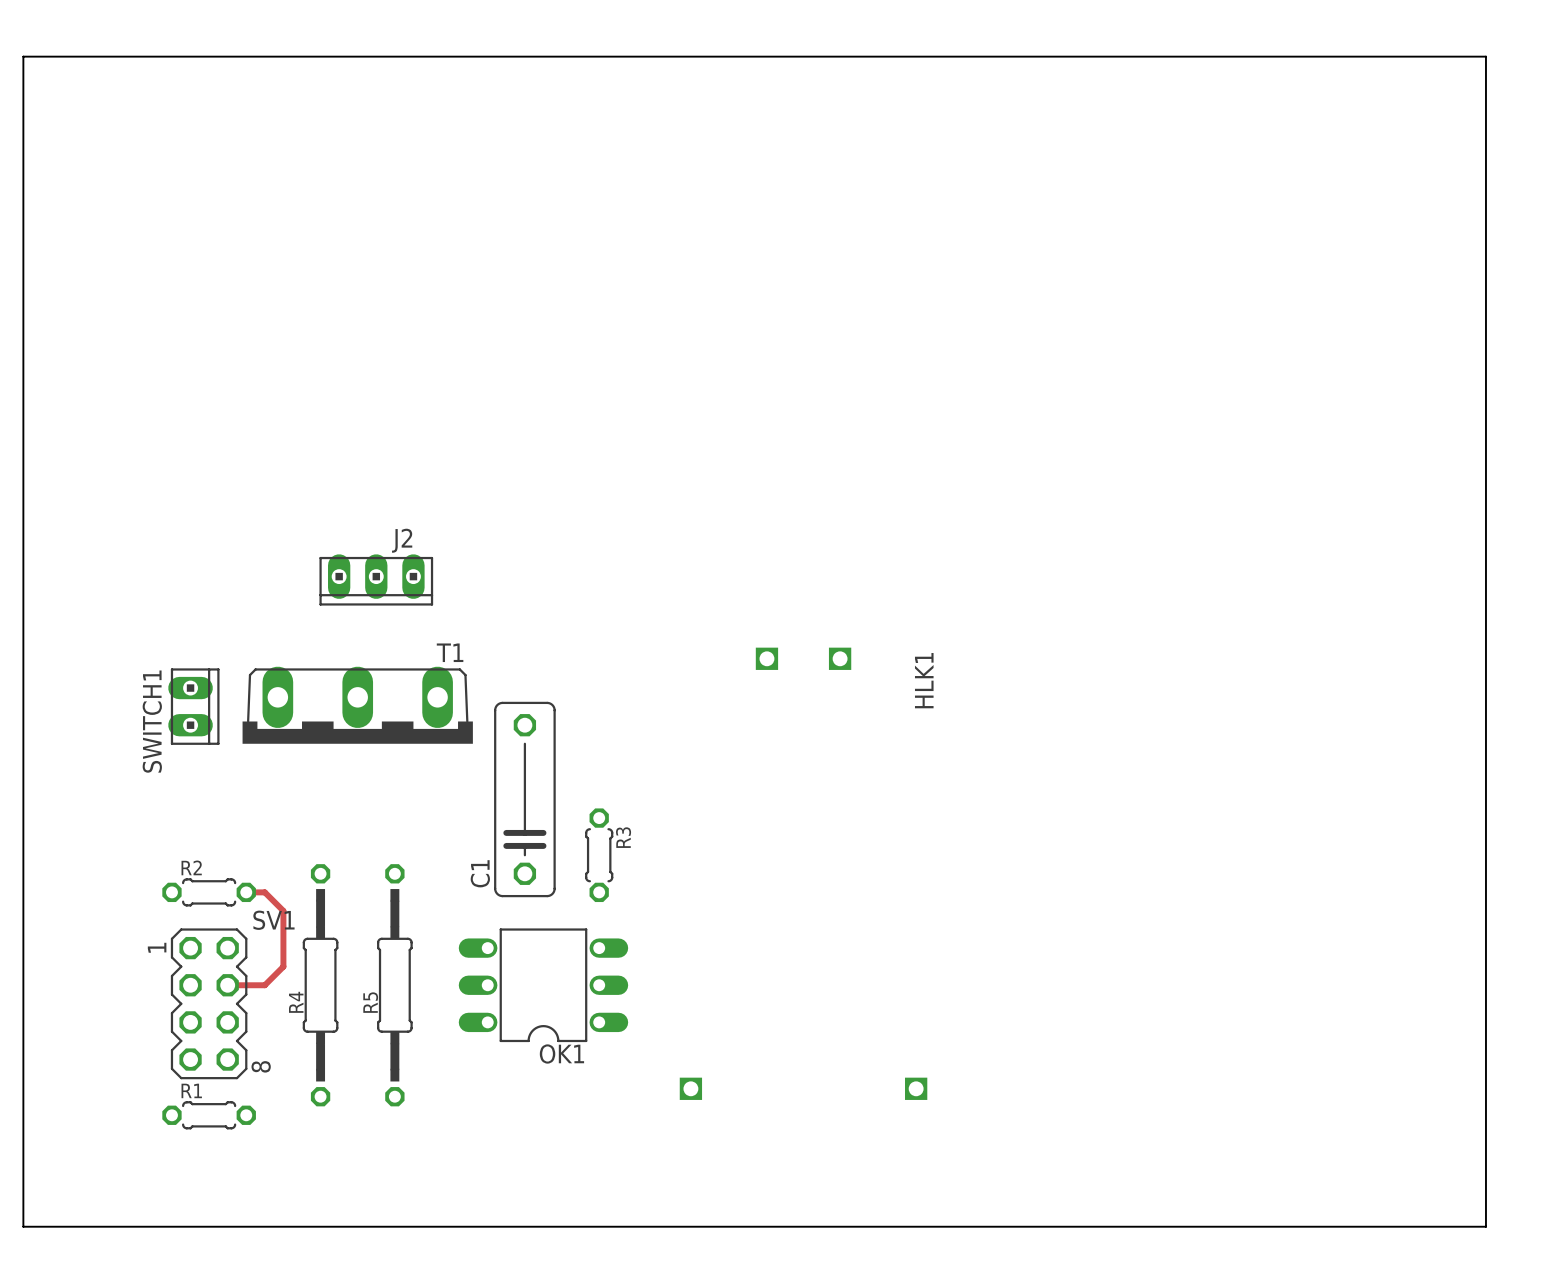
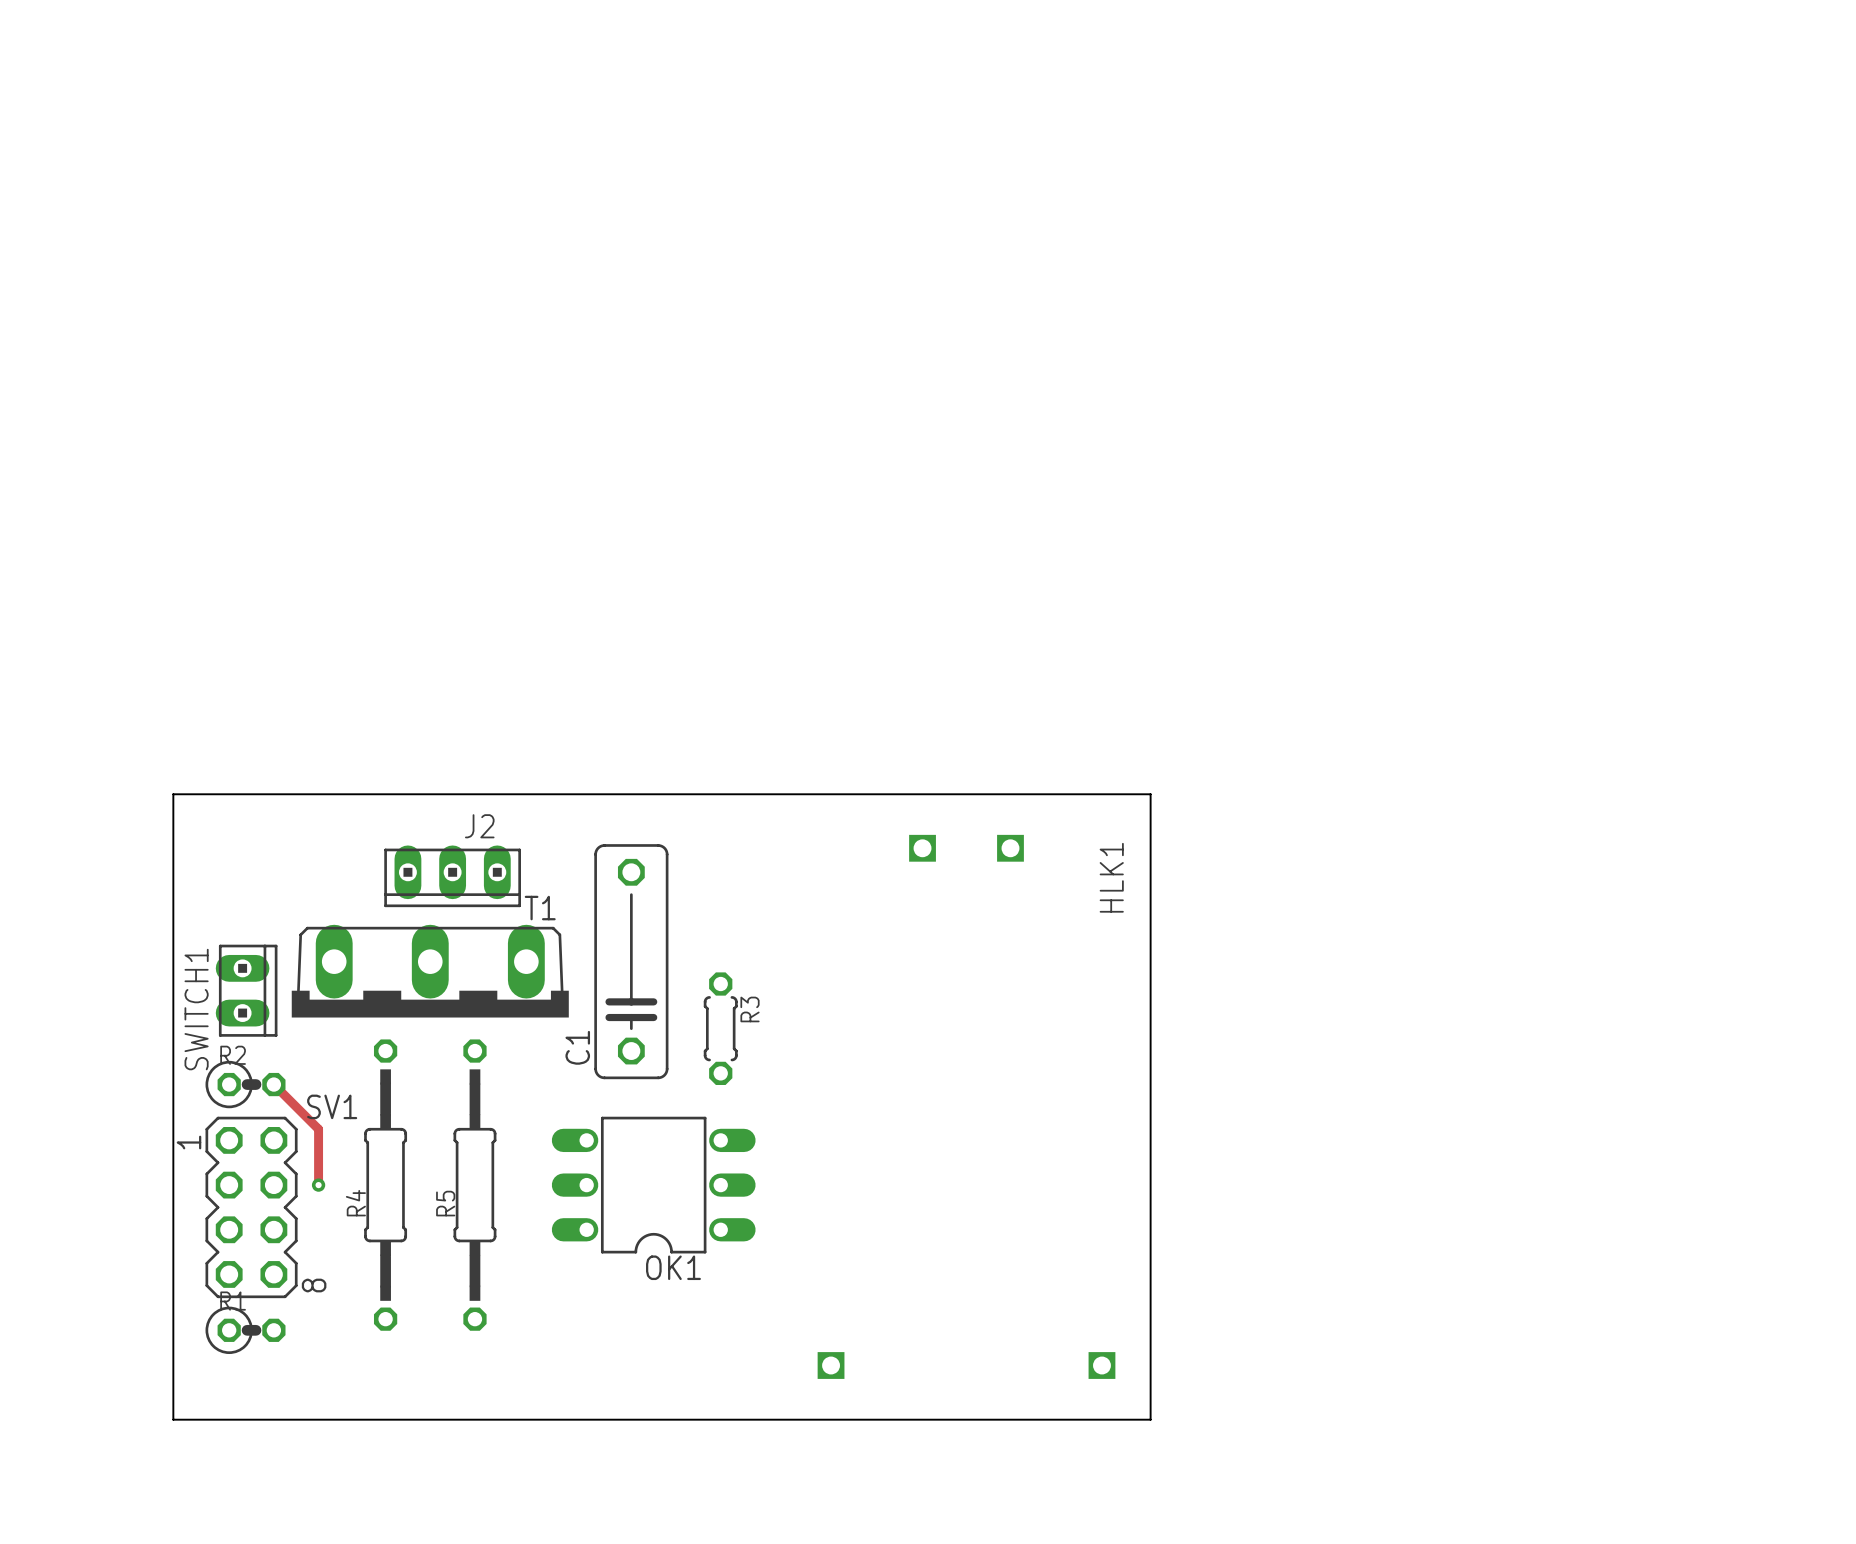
board edge: (23, 56) (1485, 56) (1485, 1226) (23, 1226) (23, 56) -> none
J2 position: (376, 579) -> (452, 876)
board edge: none -> (173, 794) (1150, 794) (1150, 1419) (173, 1419) (173, 794)
T1 position: (357, 705) -> (430, 971)
SWITCH1 position: (193, 706) -> (246, 990)
HLK1 position: (803, 873) -> (966, 1106)
R2 footprint: [162, 878, 256, 907] -> [205, 1060, 286, 1109]
track: (246, 892) (264, 892) (283, 910) (283, 966) (264, 985) (227, 985) -> none
track: none -> (273, 1084) (318, 1129) (318, 1185)
via: none -> (318, 1185)
R1 footprint: [162, 1101, 256, 1130] -> [205, 1306, 286, 1355]

